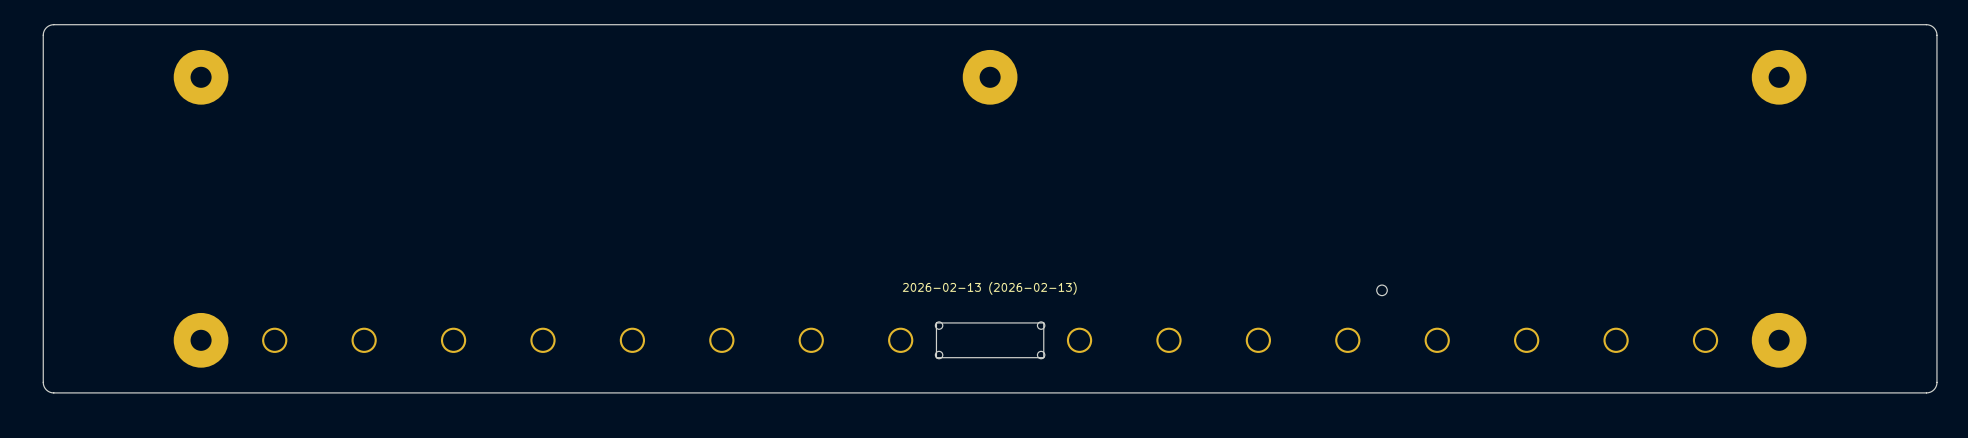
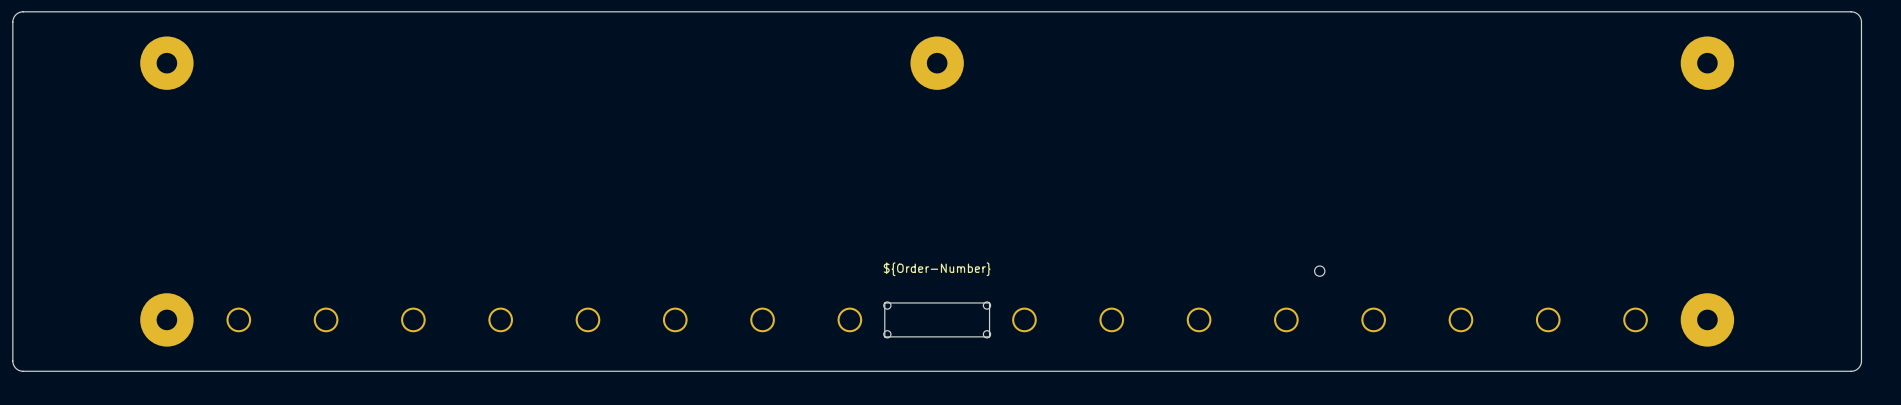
drawing shape: [902, 281, 1077, 295] -> [883, 262, 991, 277]

